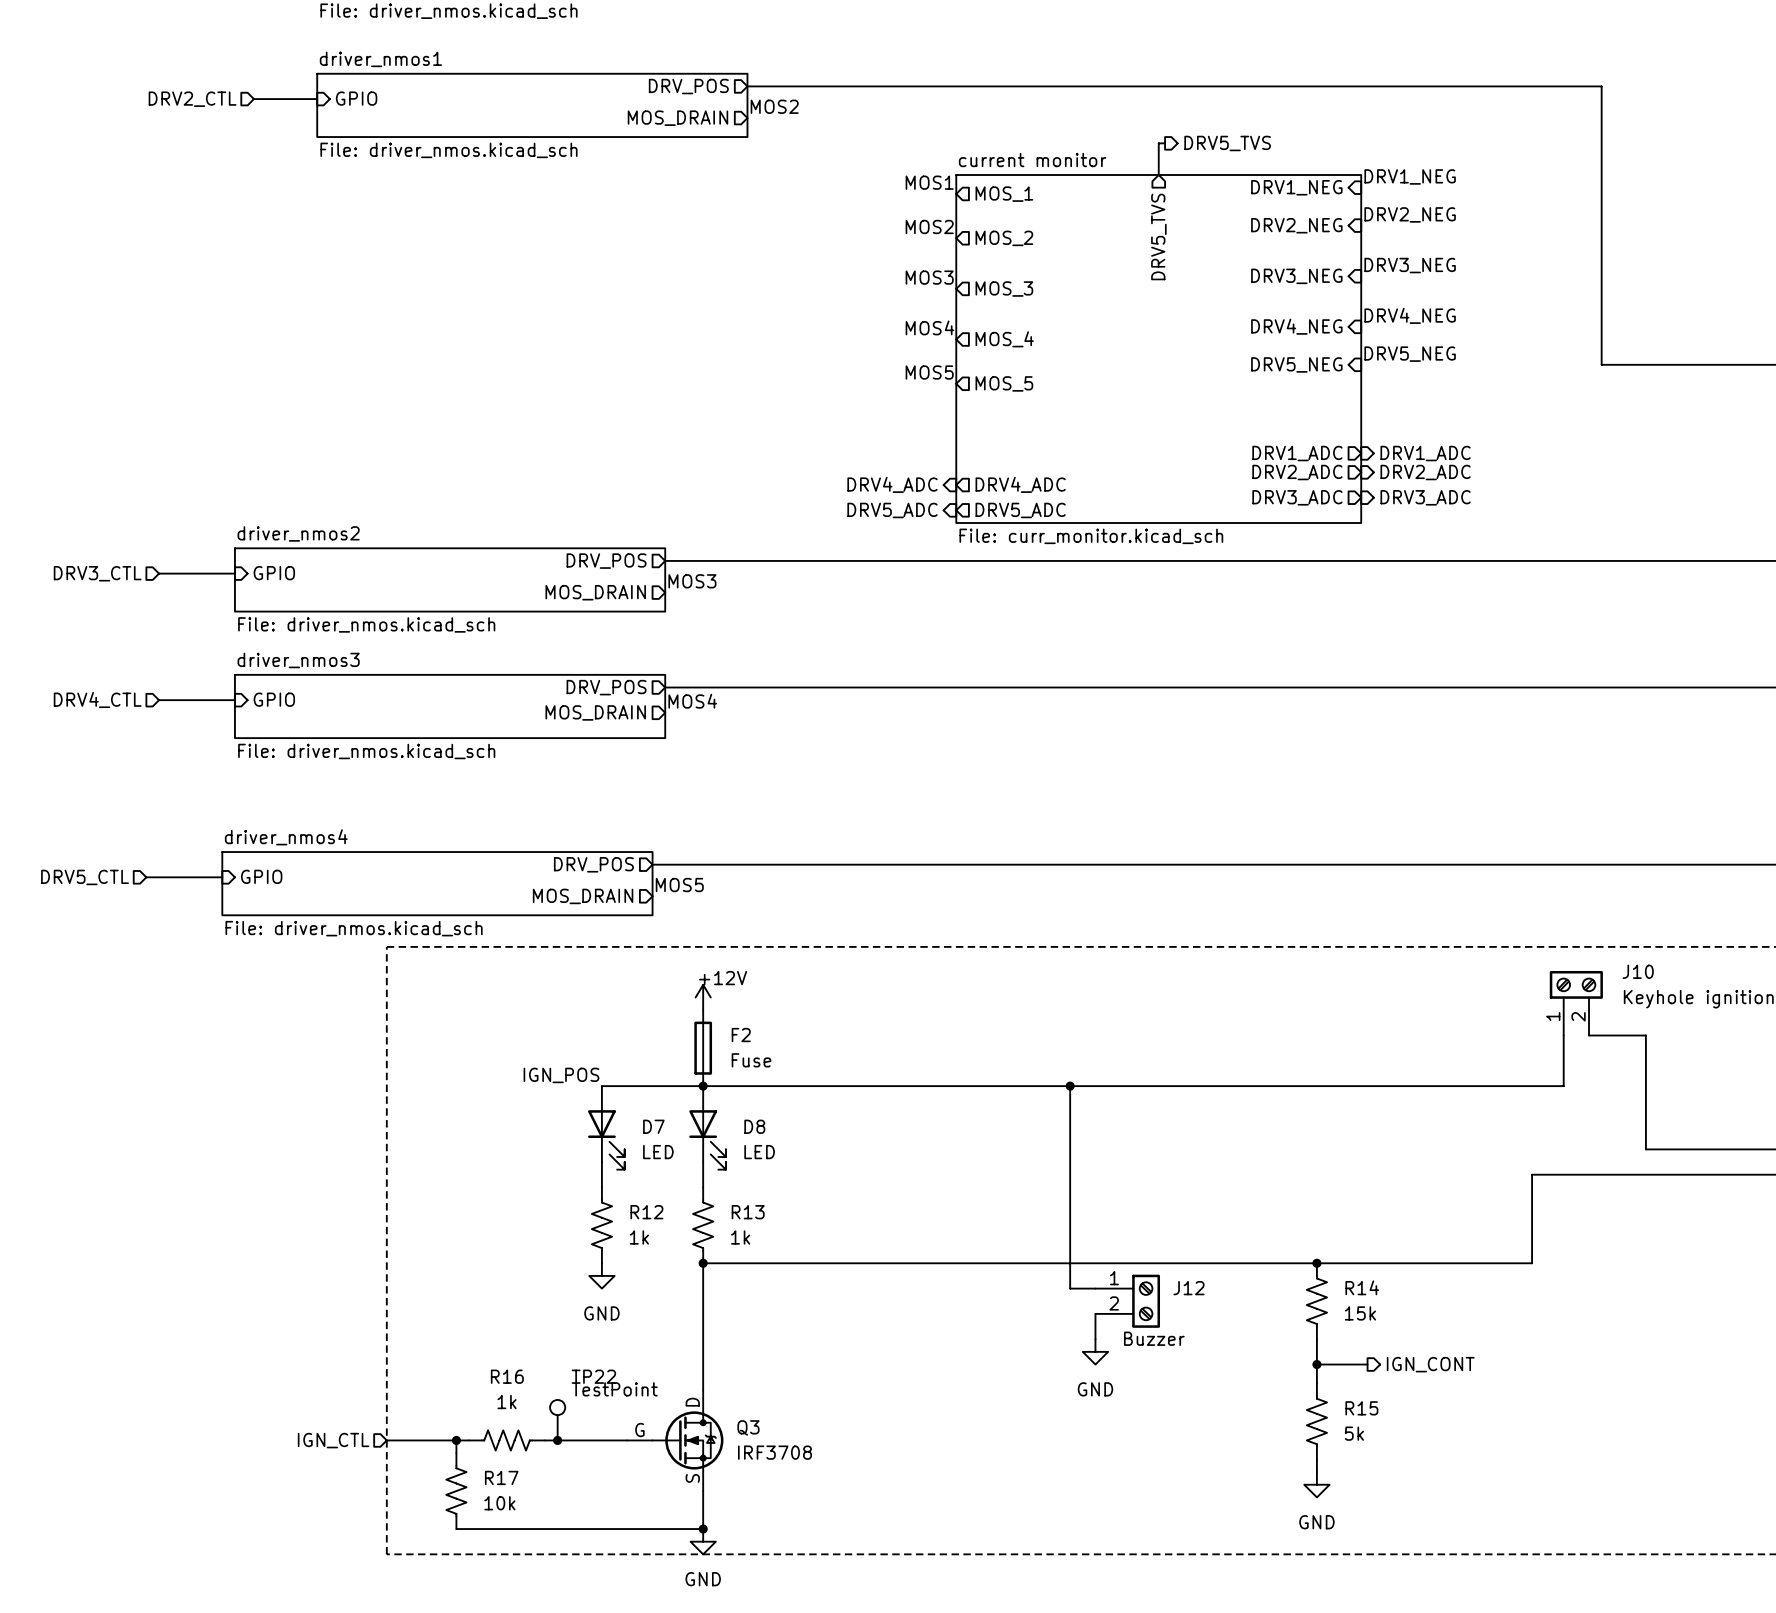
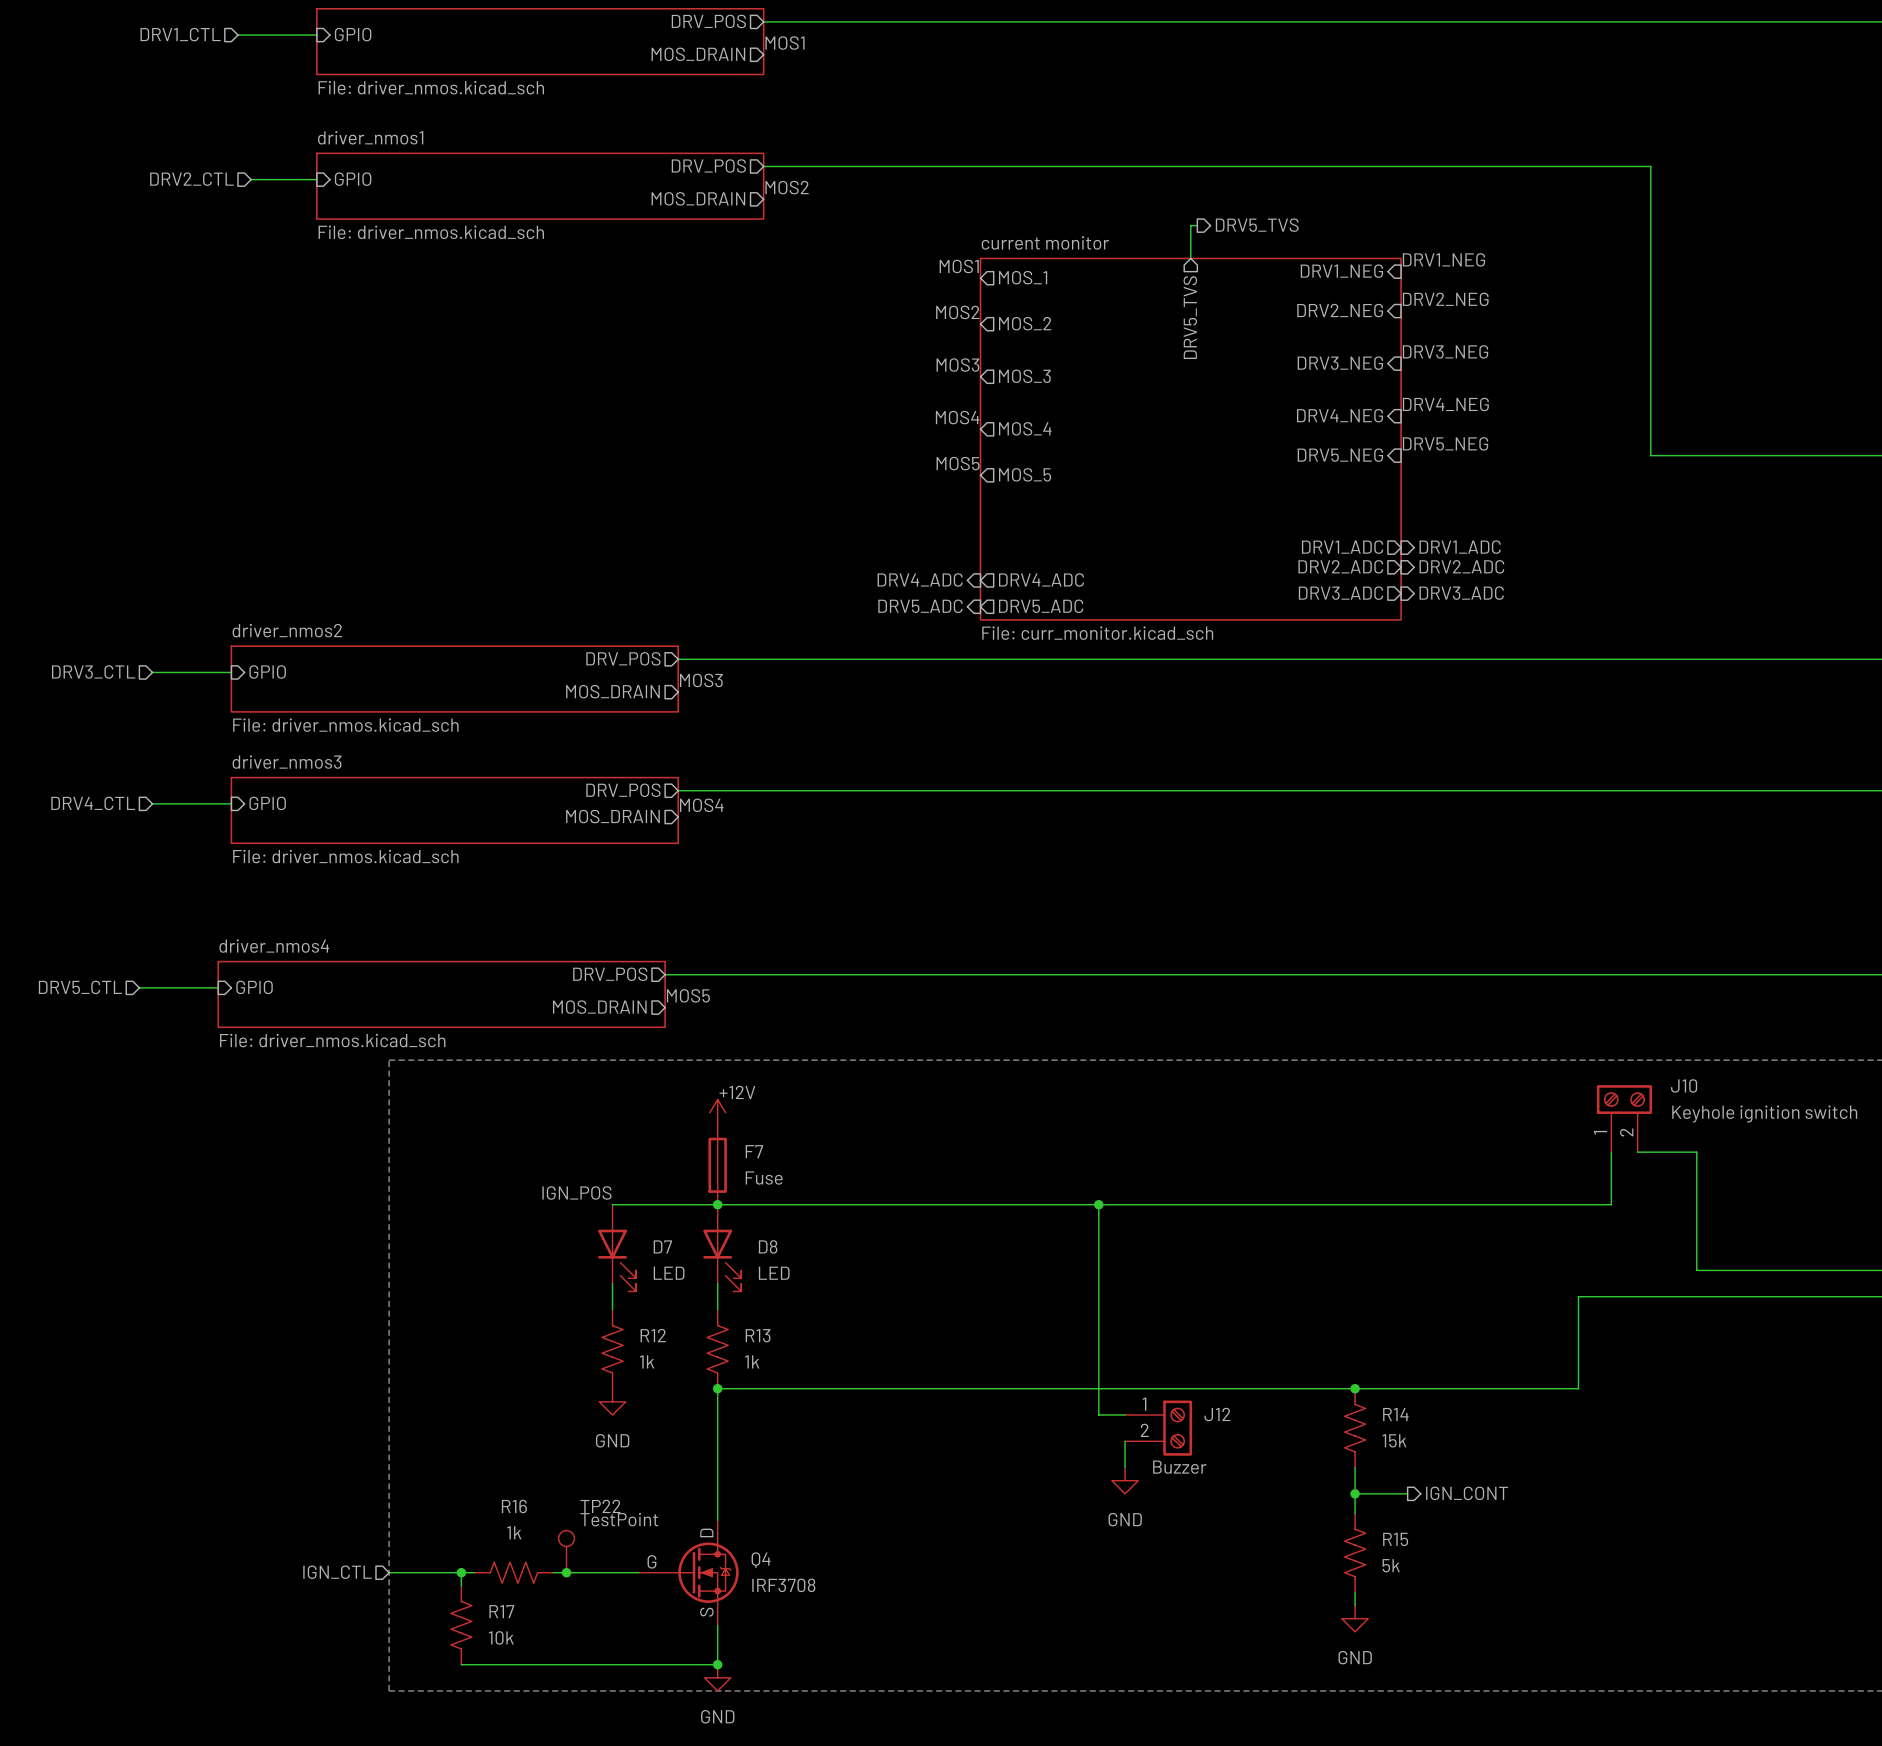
F2 name: F2 (741, 1035) -> F7 (754, 1151)
Q3 name: Q3 (748, 1427) -> Q4 (761, 1560)

